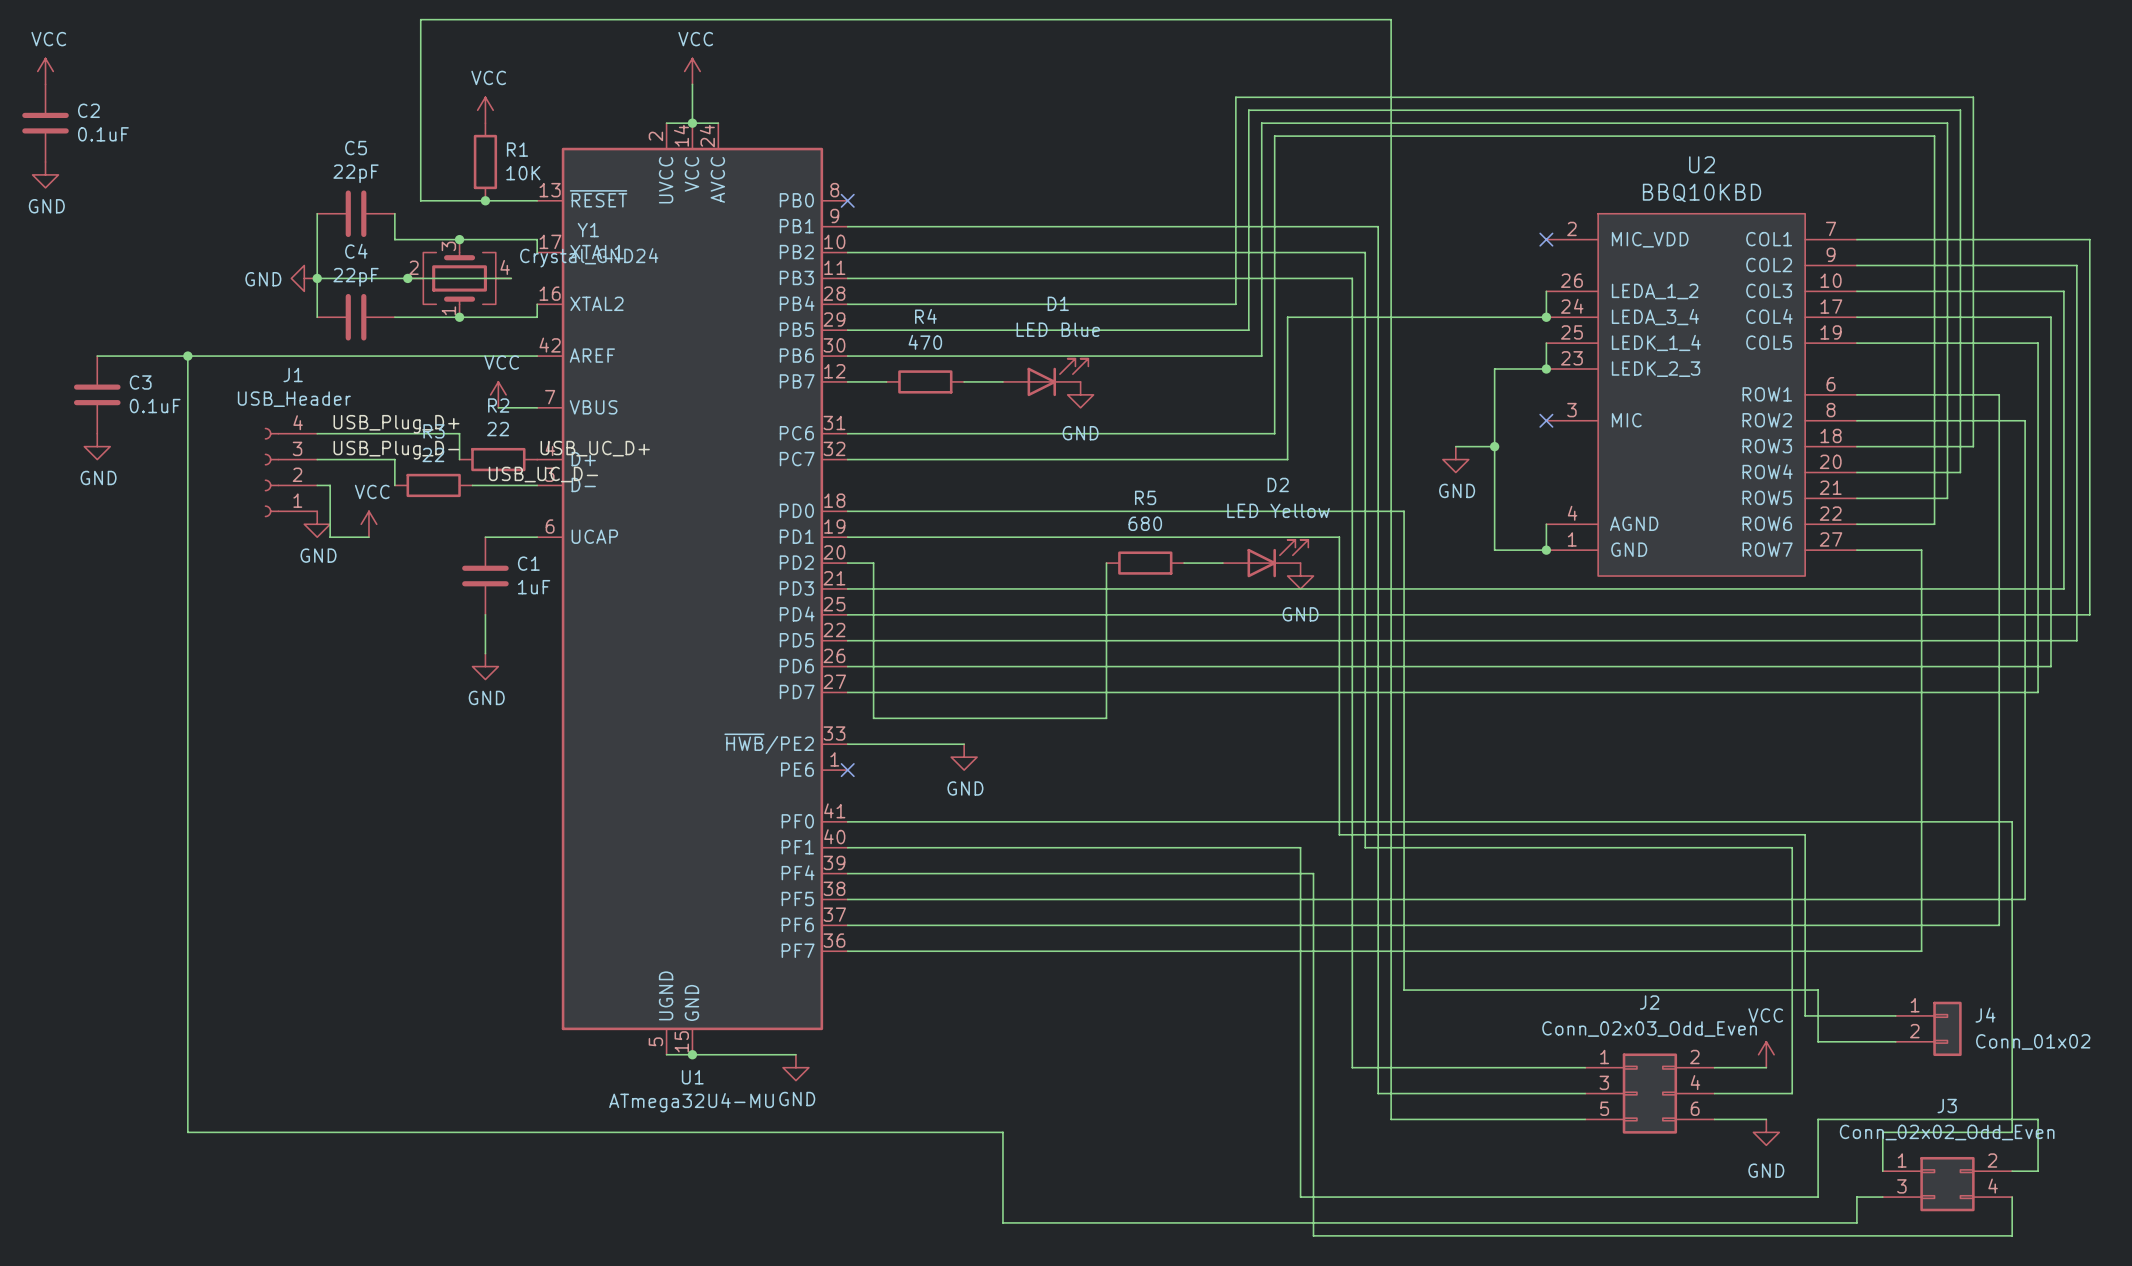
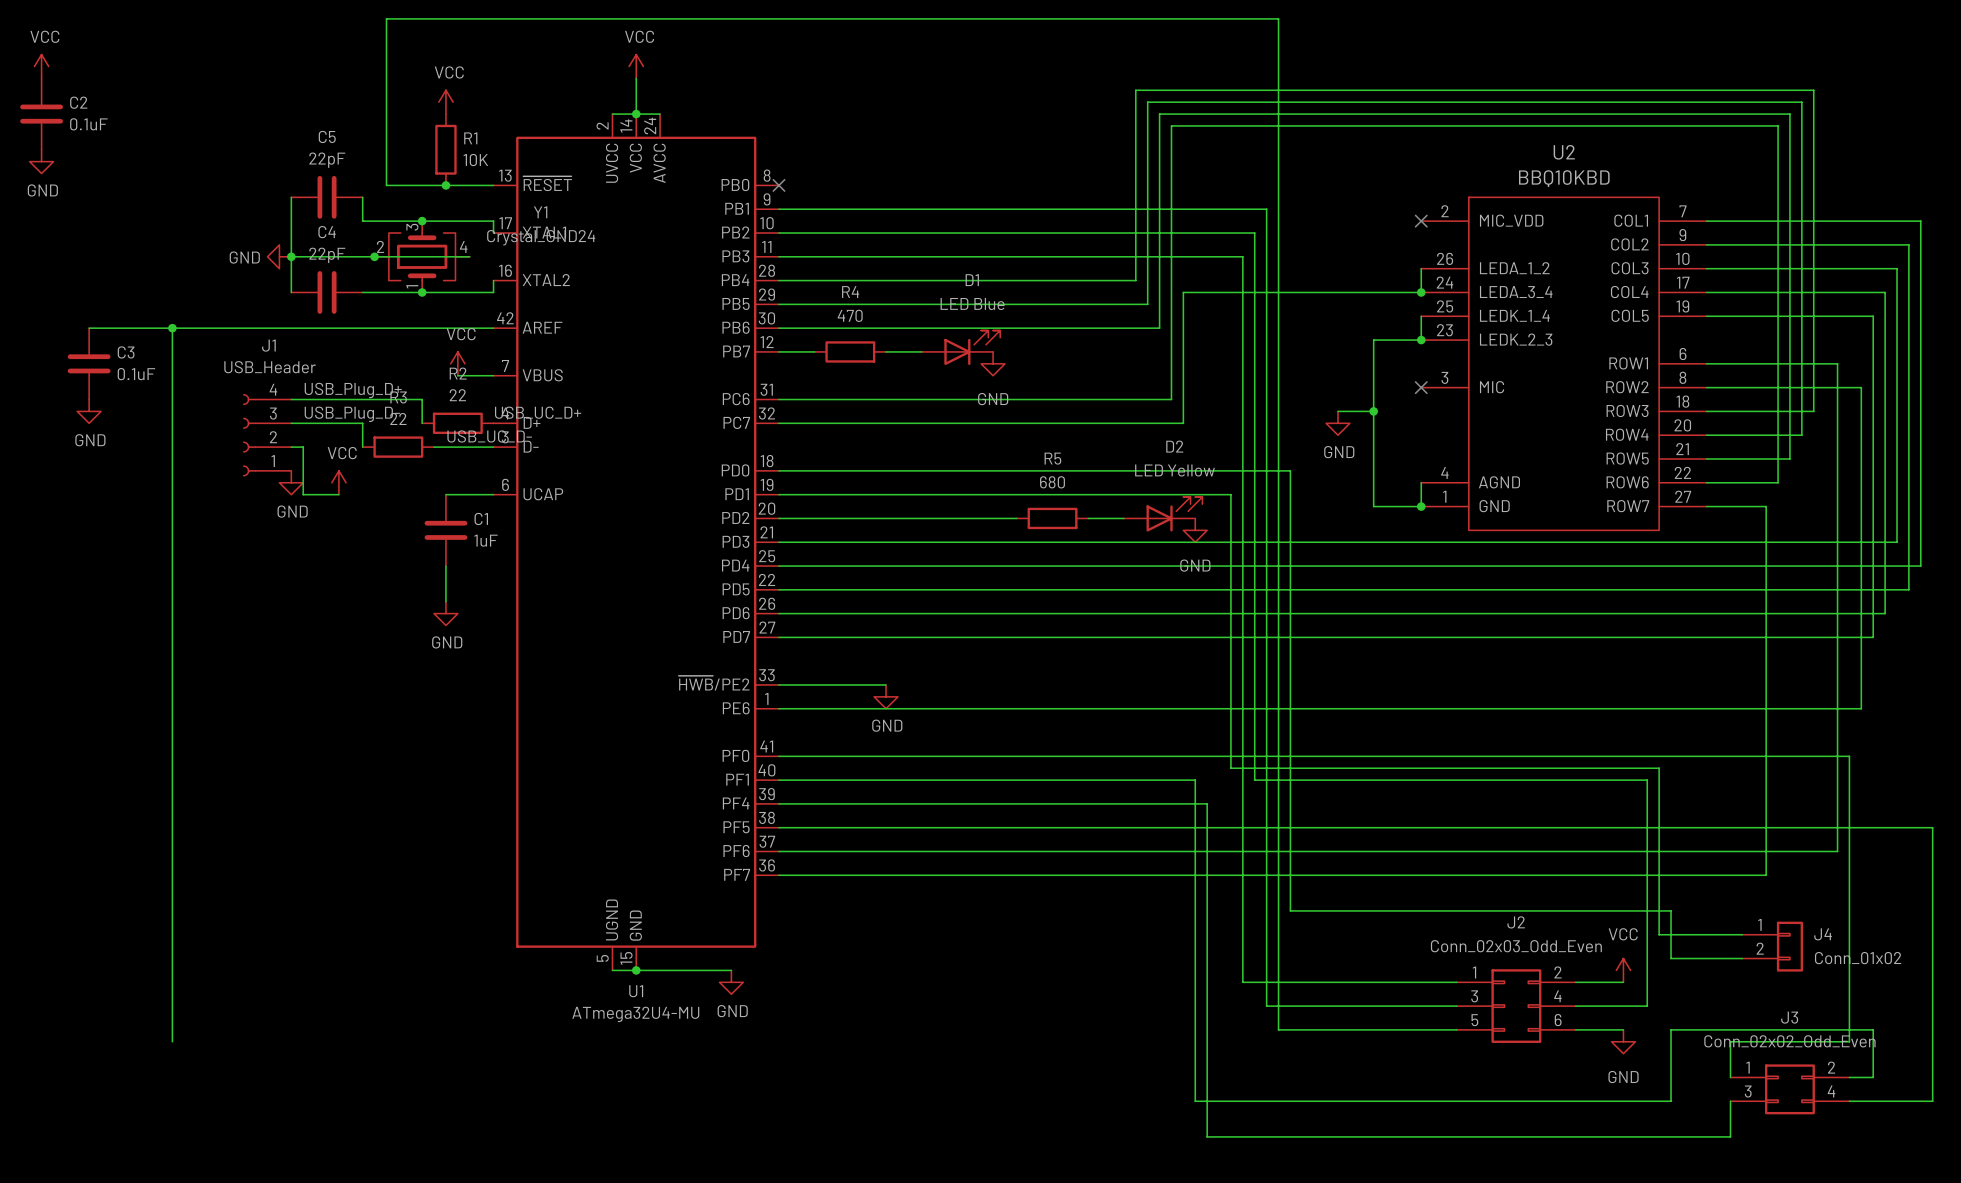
wire: (873, 563) (873, 718) (1106, 718) (1106, 563) -> (802, 518) (1016, 518)
wire: none -> (778, 708) (1861, 708)
no-connect mark: (847, 770) -> none
wire: (2025, 770) (2025, 899) -> (1849, 1101) (1932, 1101) (1932, 827) (1861, 827)
wire: (187, 1132) (1002, 1132) (1002, 1222) (1856, 1222) (1856, 1197) (1882, 1197) -> none
wire: (2012, 1197) (2012, 1235) (1882, 1235) -> (1730, 1101) (1730, 1136)

